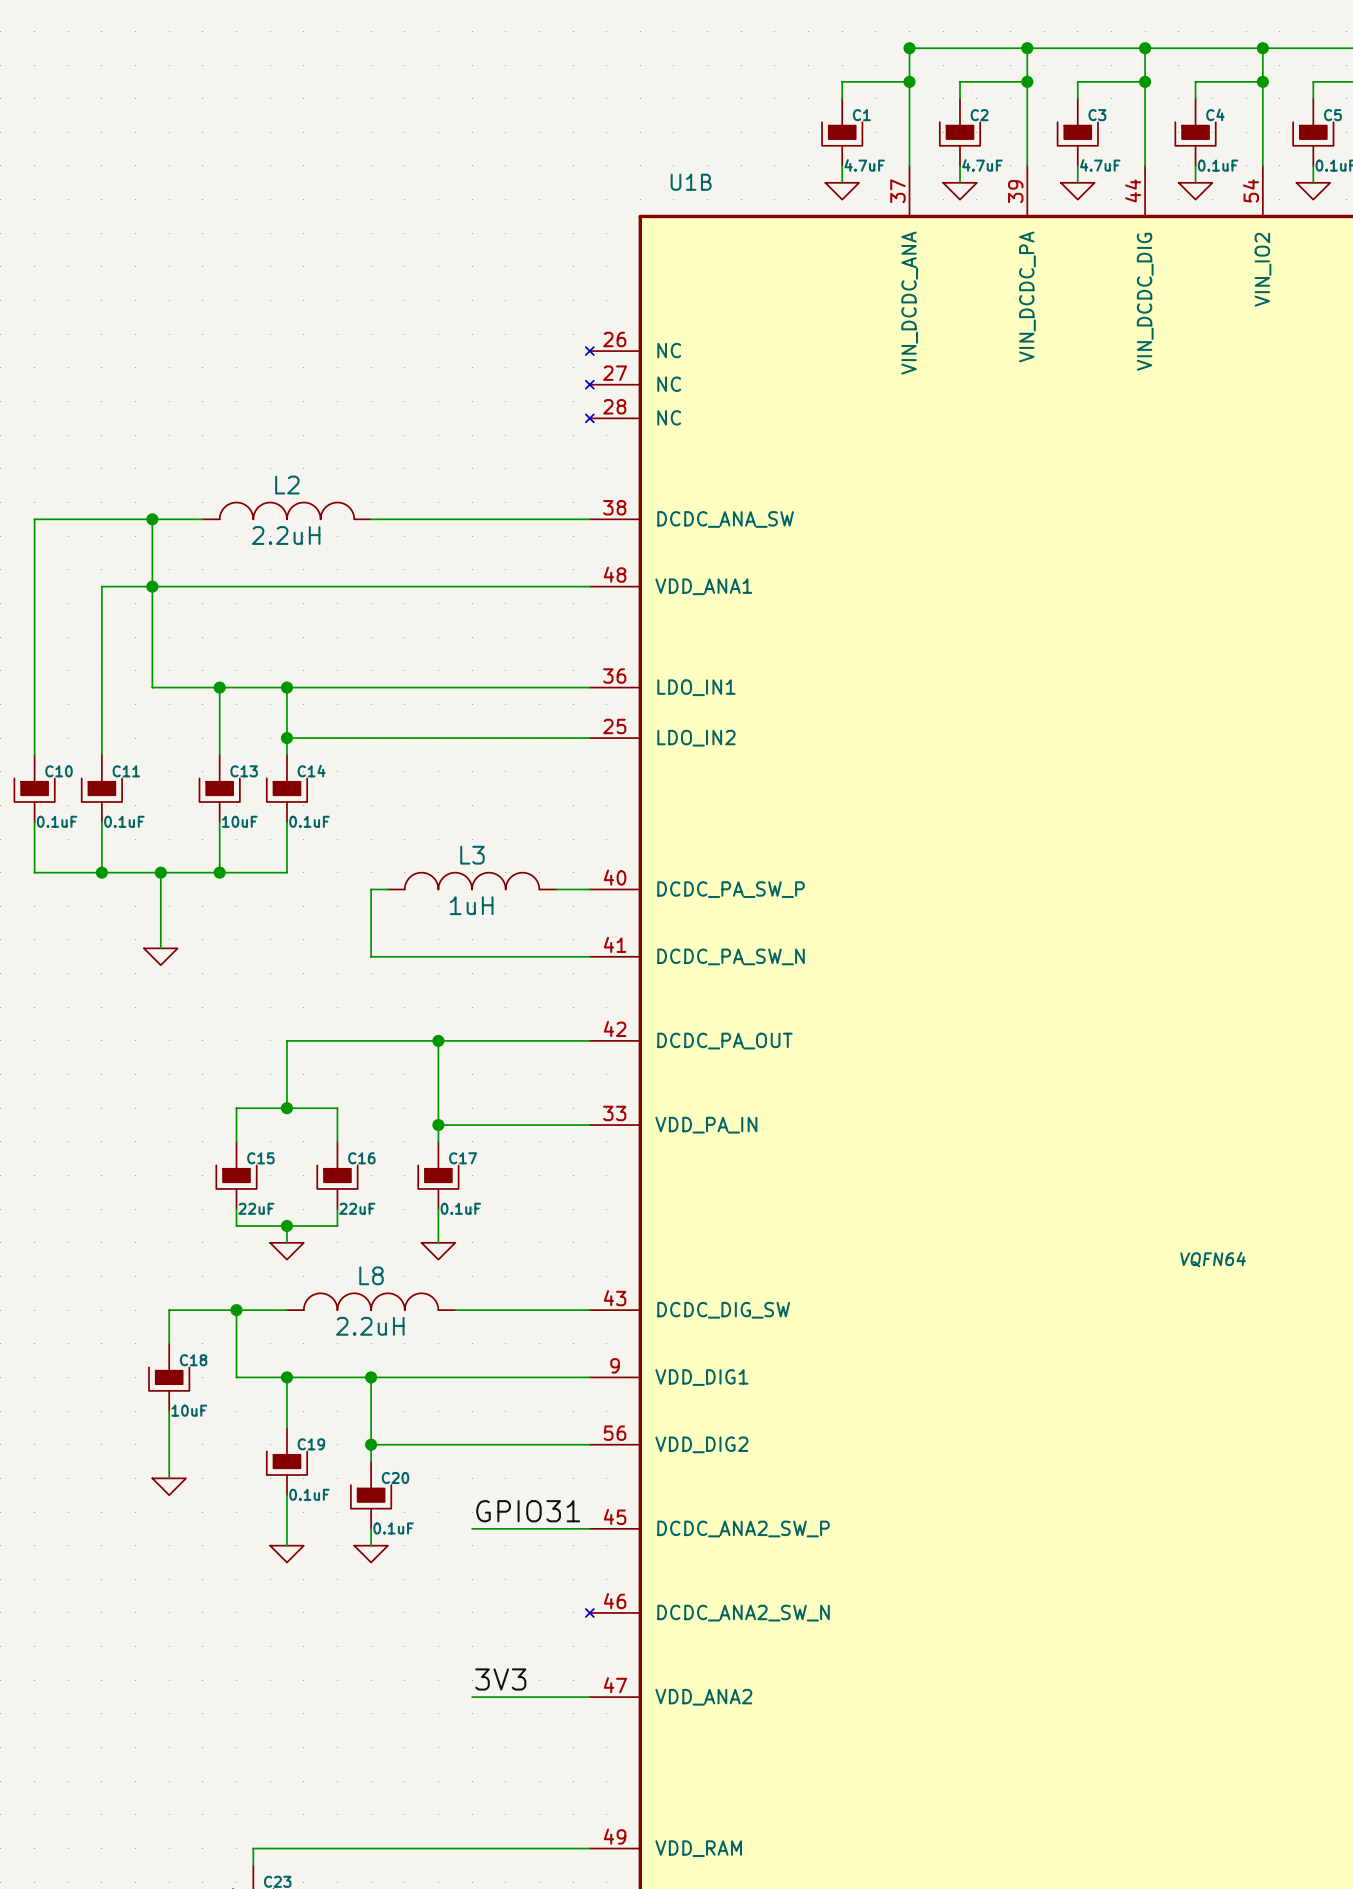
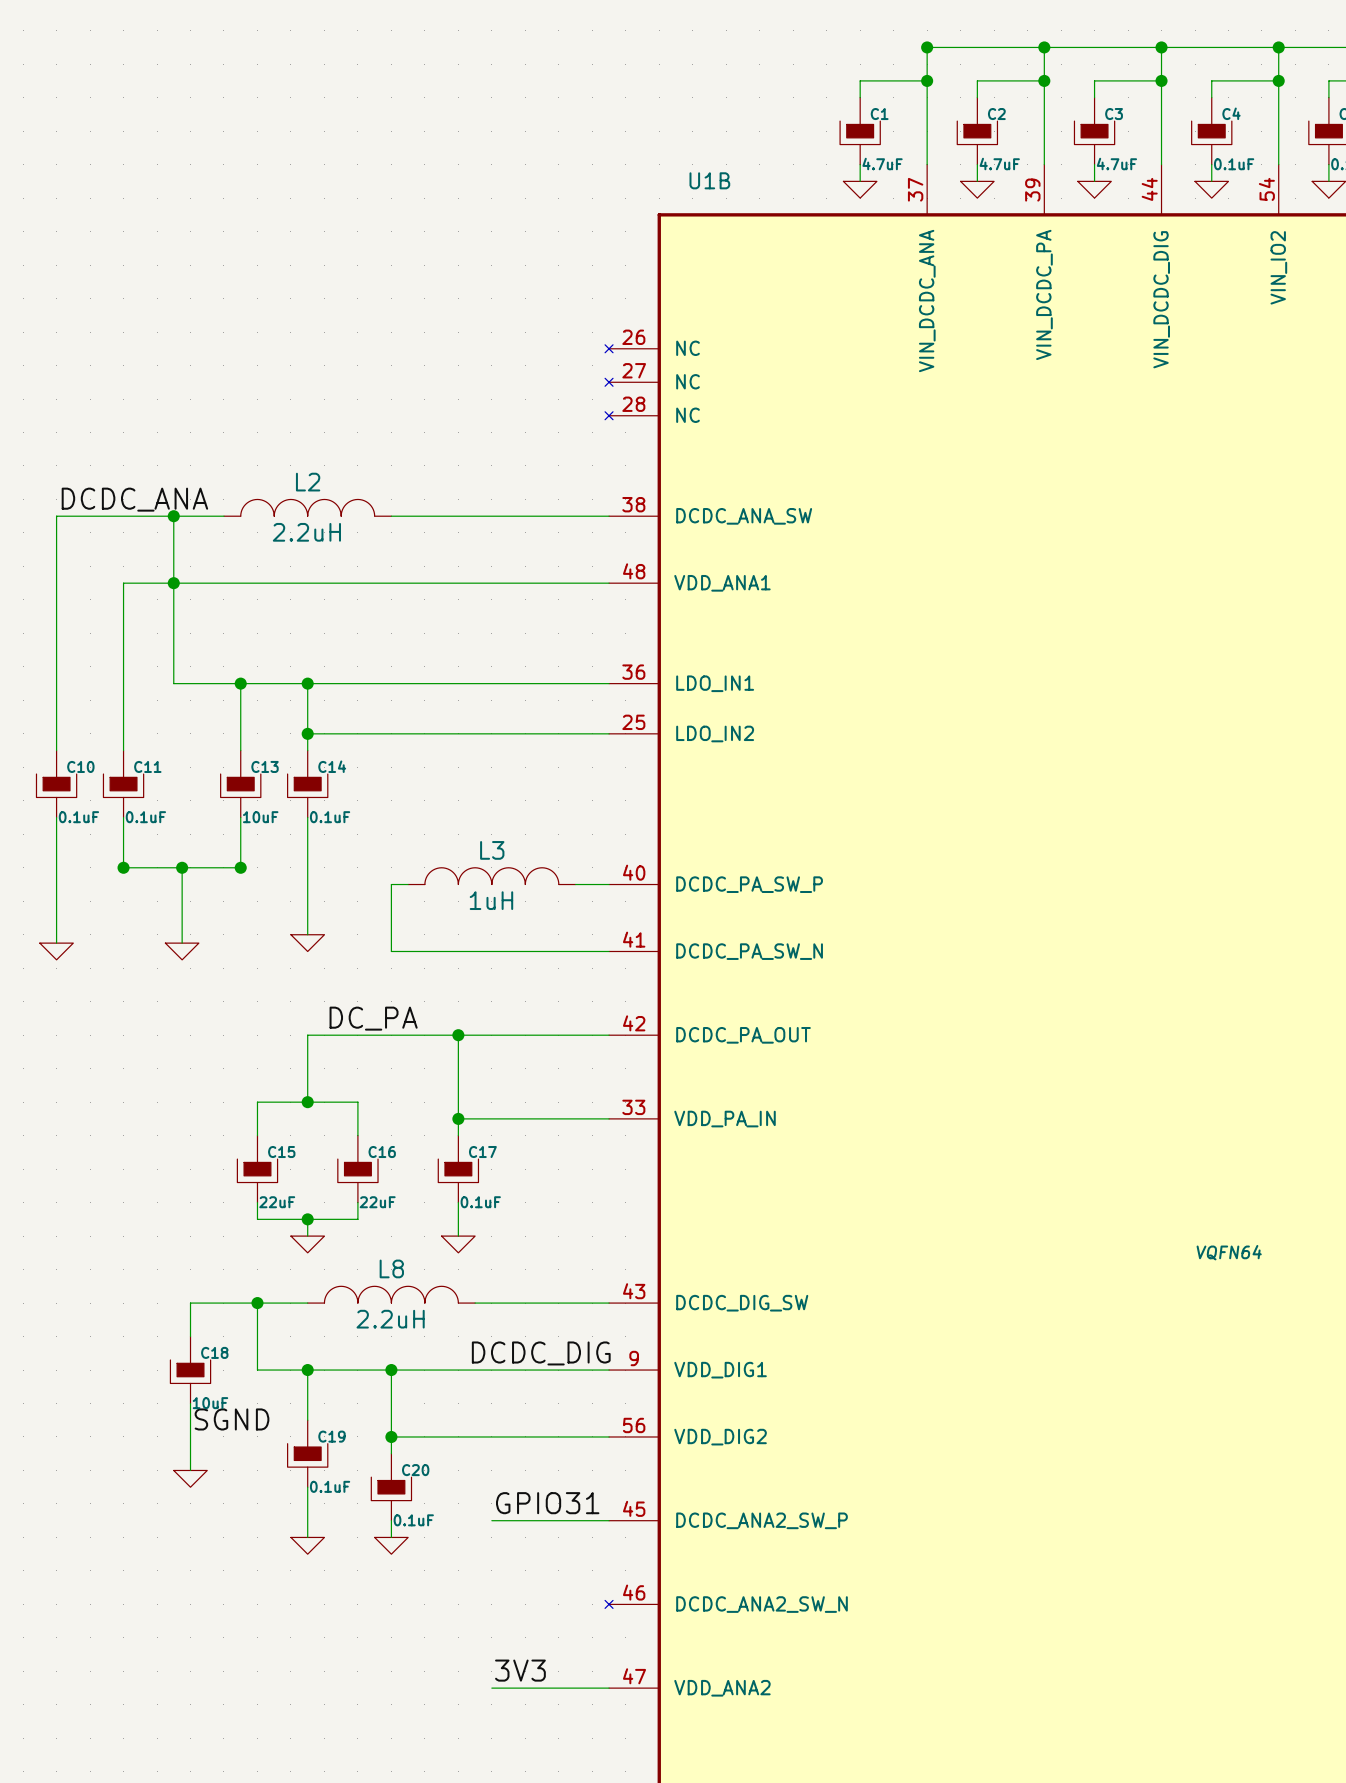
label: none -> DCDC_ANA (134, 499)
wire: (34, 872) (101, 872) -> (56, 867) (56, 943)
wire: (219, 872) (286, 872) -> (307, 934) (307, 867)
power symbol: none -> (307, 943)
power symbol: none -> (56, 951)
label: none -> DC_PA (373, 1018)
label: none -> DCDC_DIG (541, 1353)
label: none -> SGND (232, 1419)

